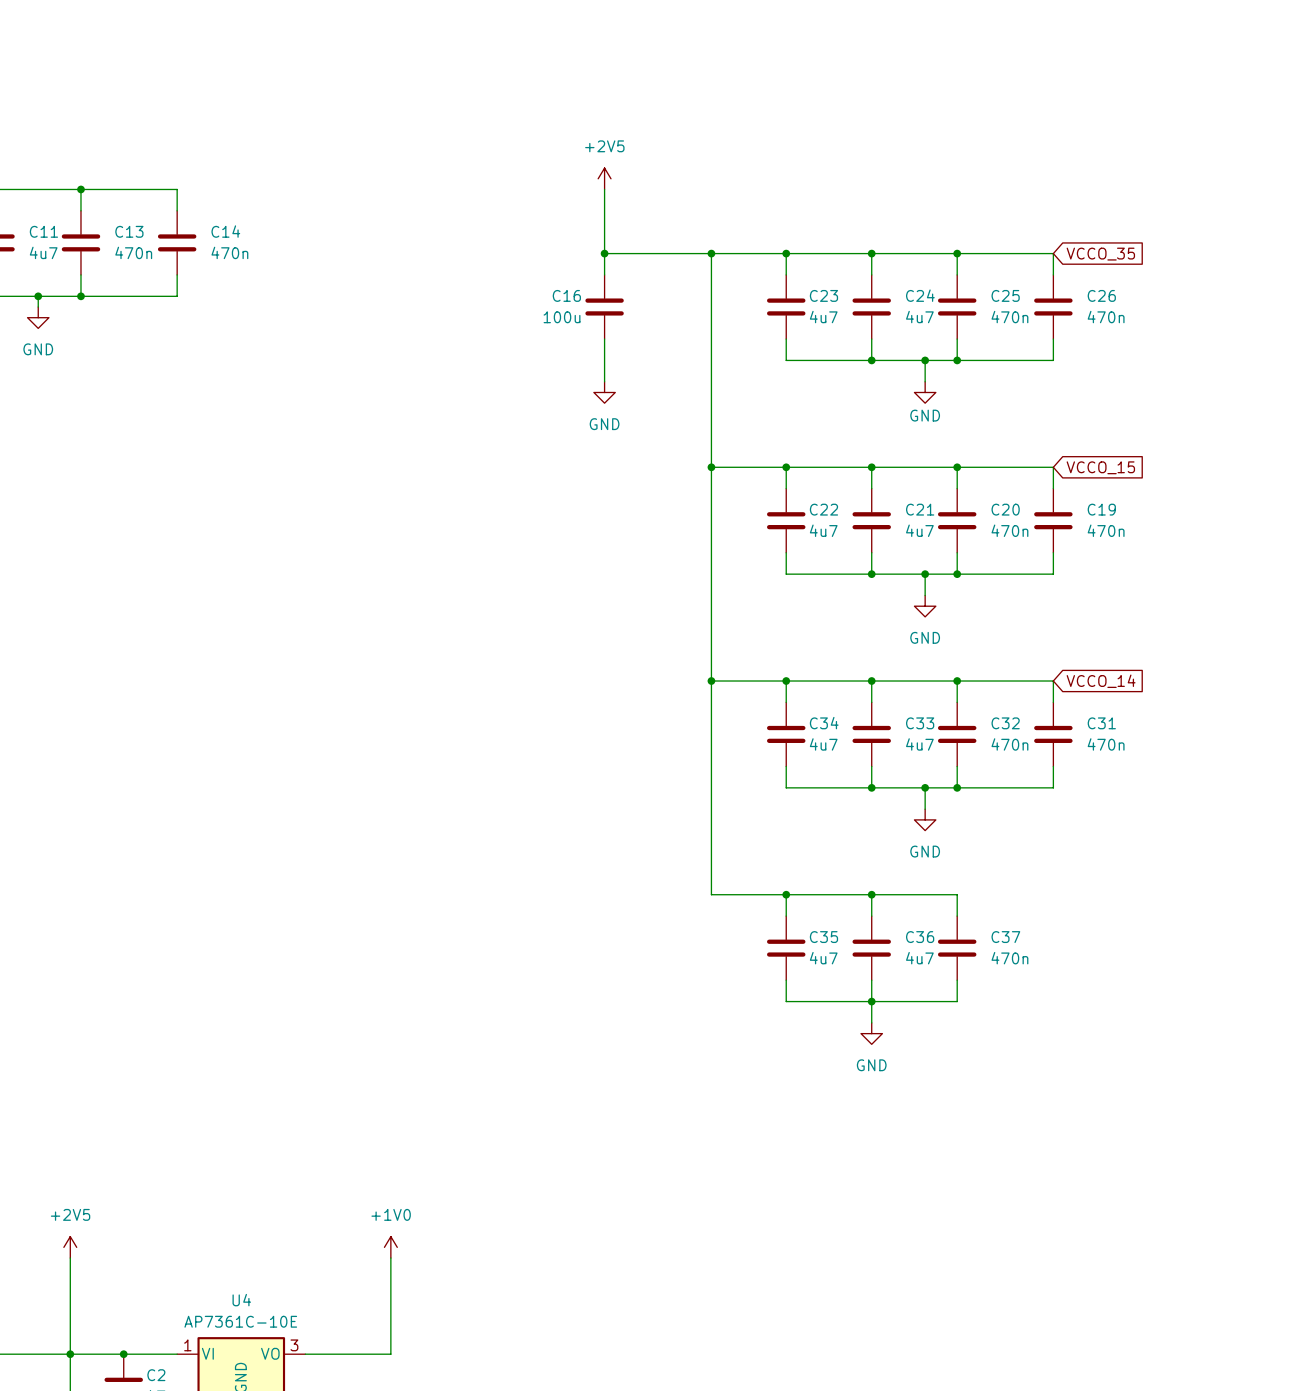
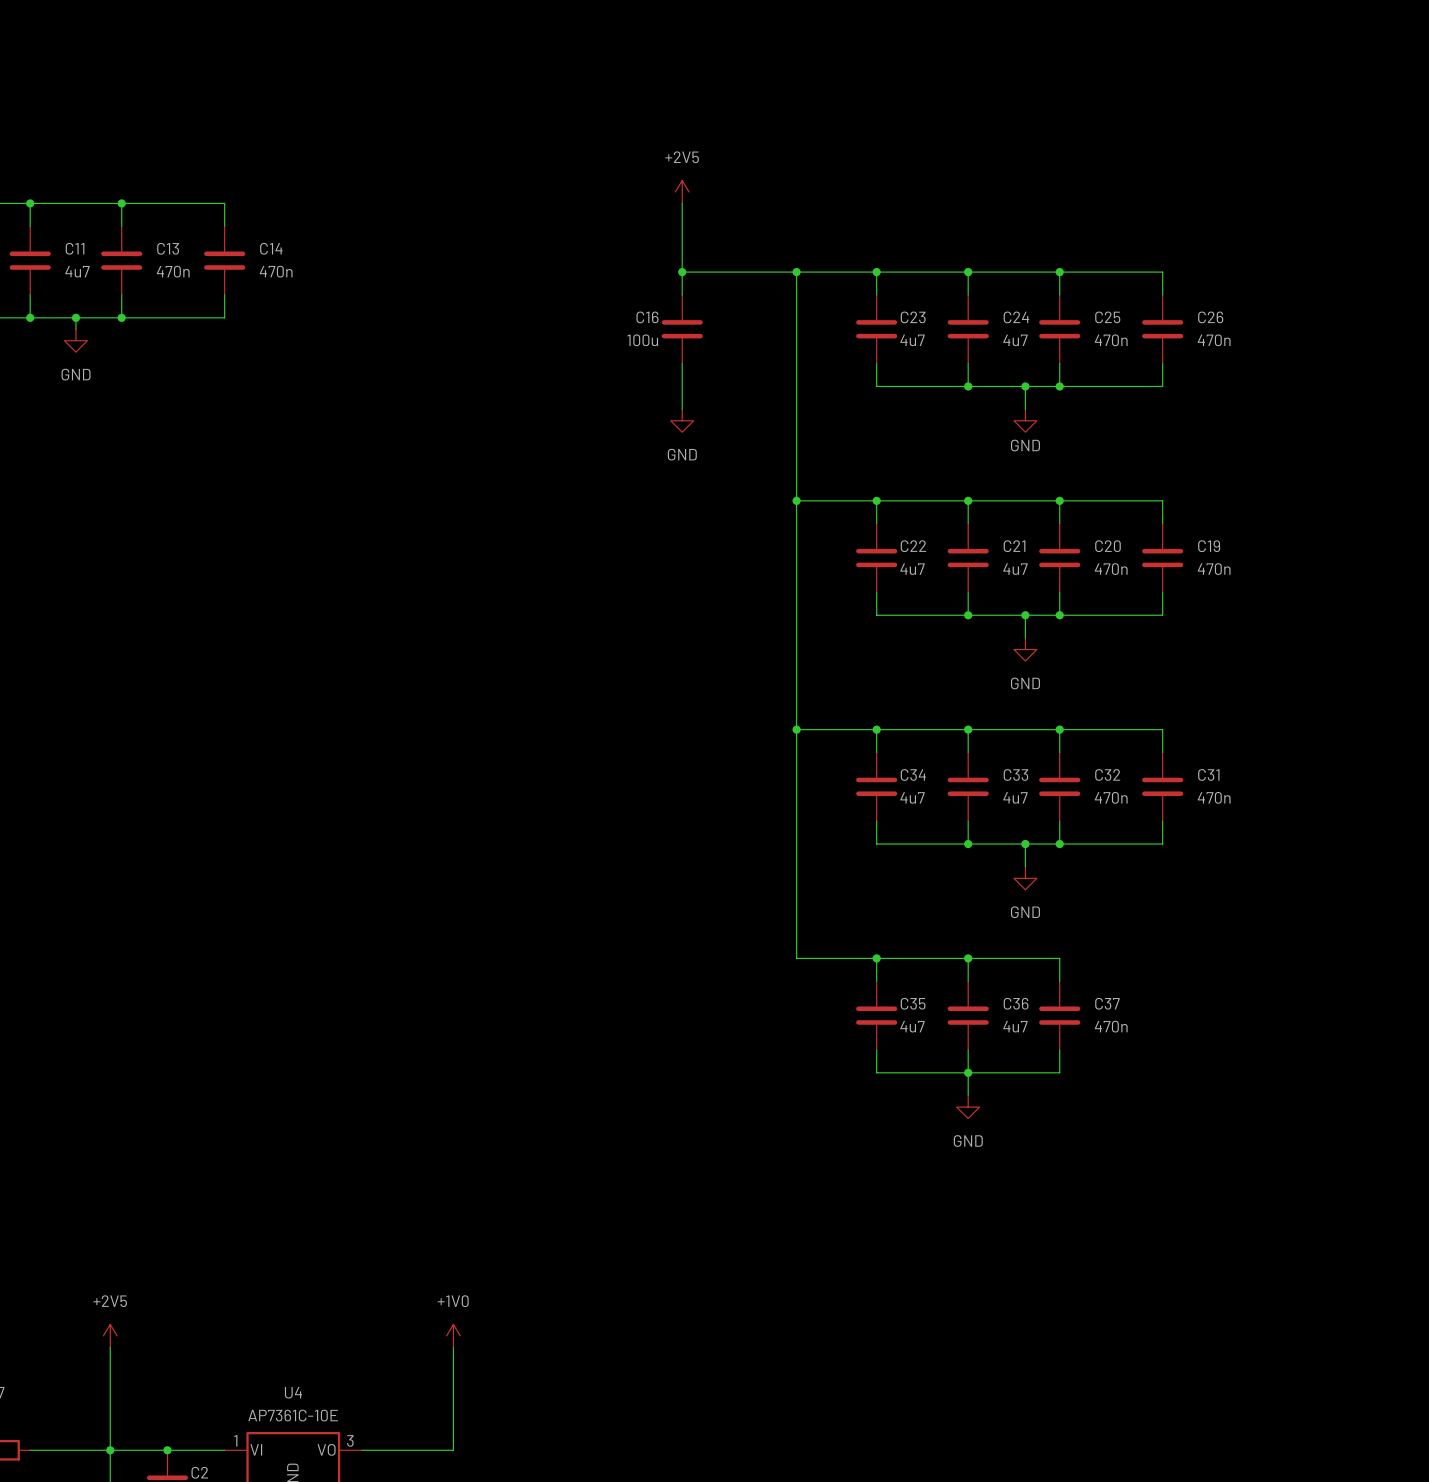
global label: VCCO_35 (1100, 254) -> none
global label: VCCO_15 (1100, 467) -> none
global label: VCCO_14 (1101, 681) -> none

